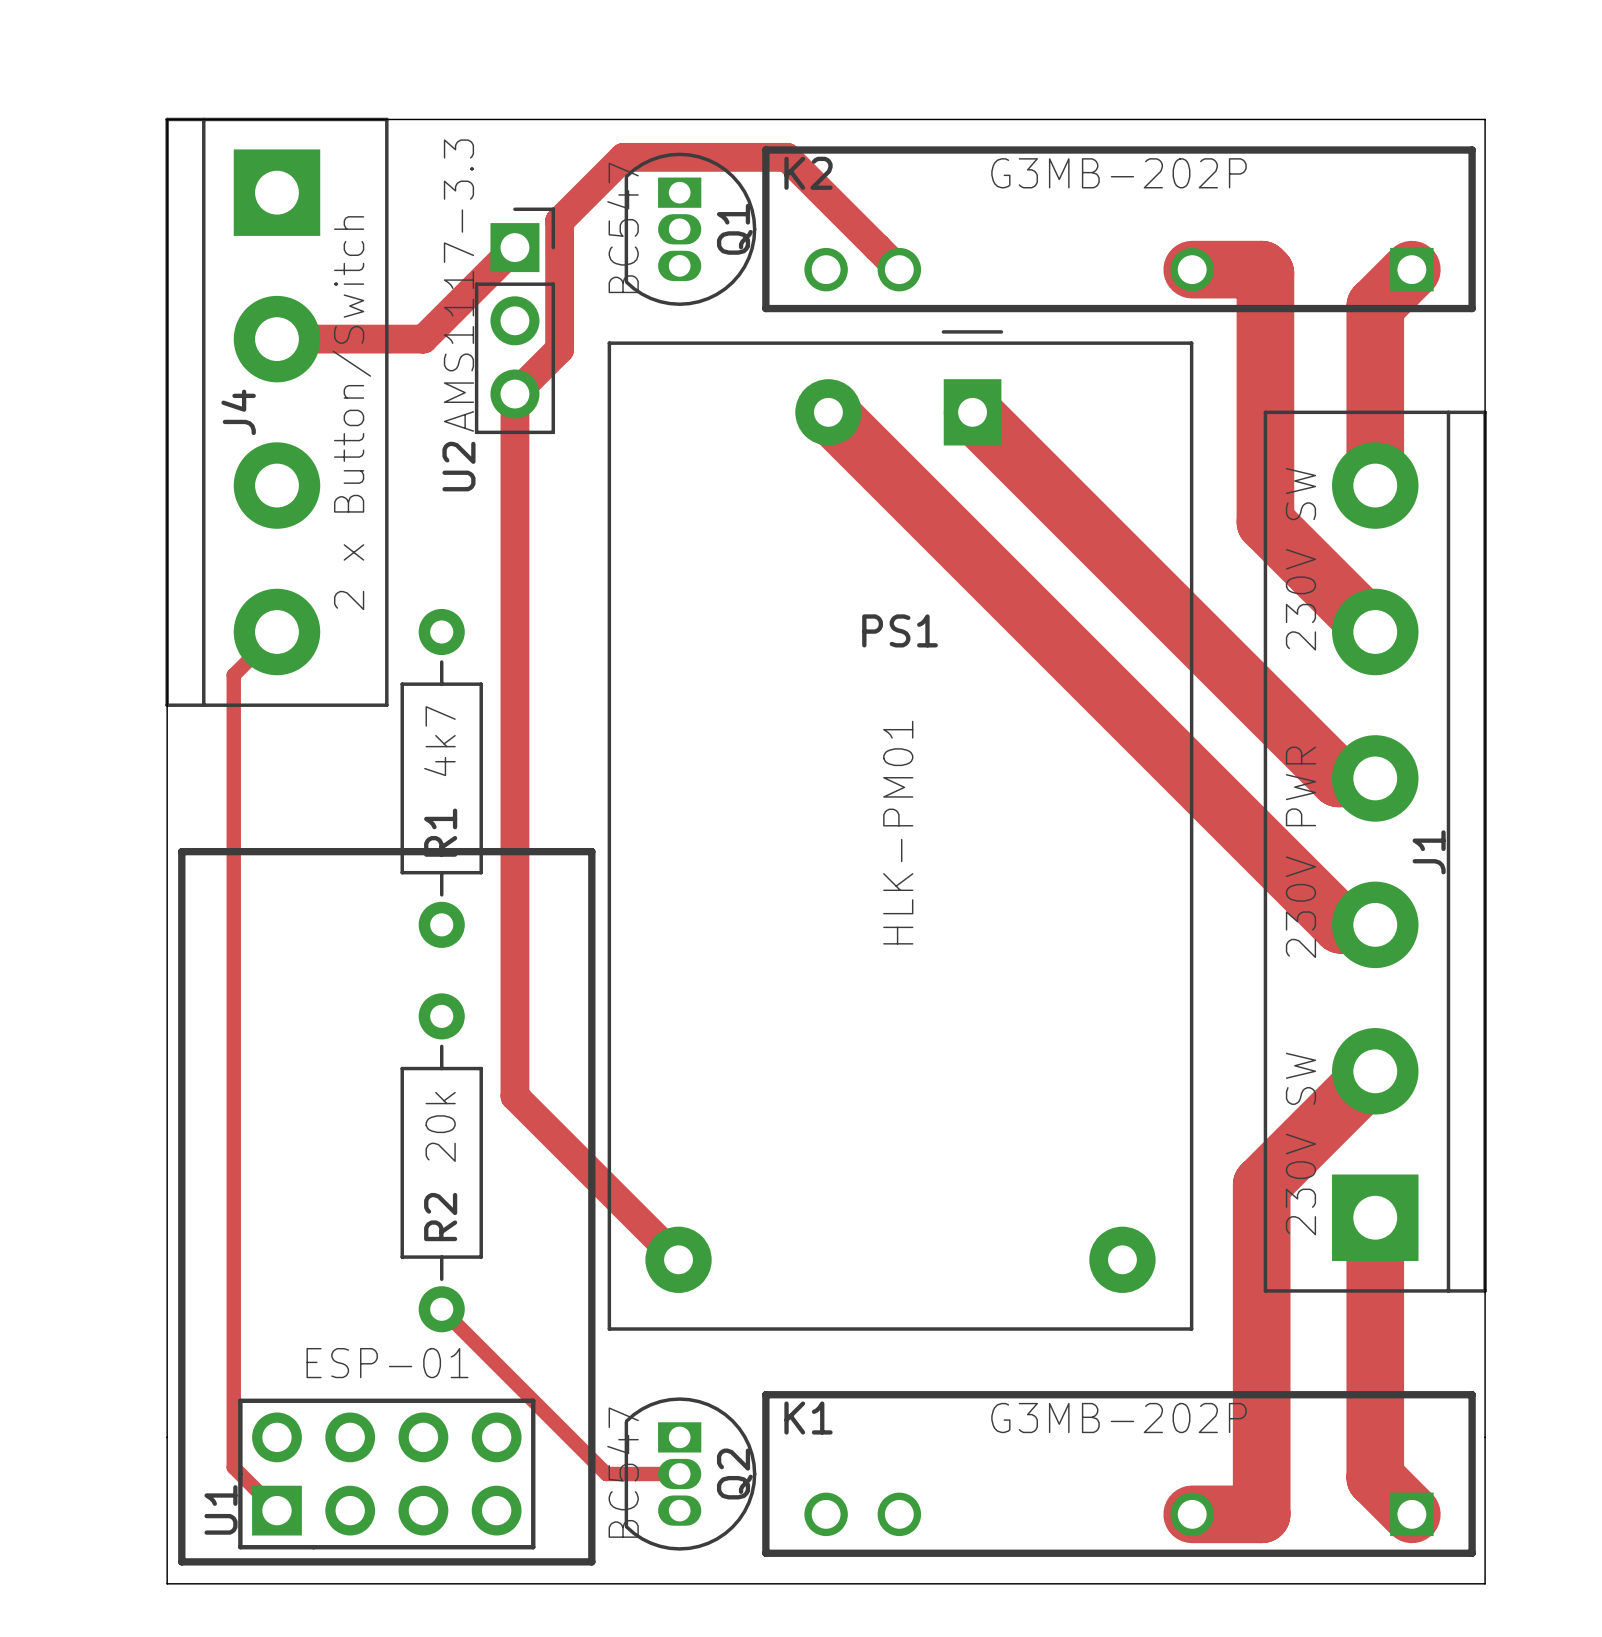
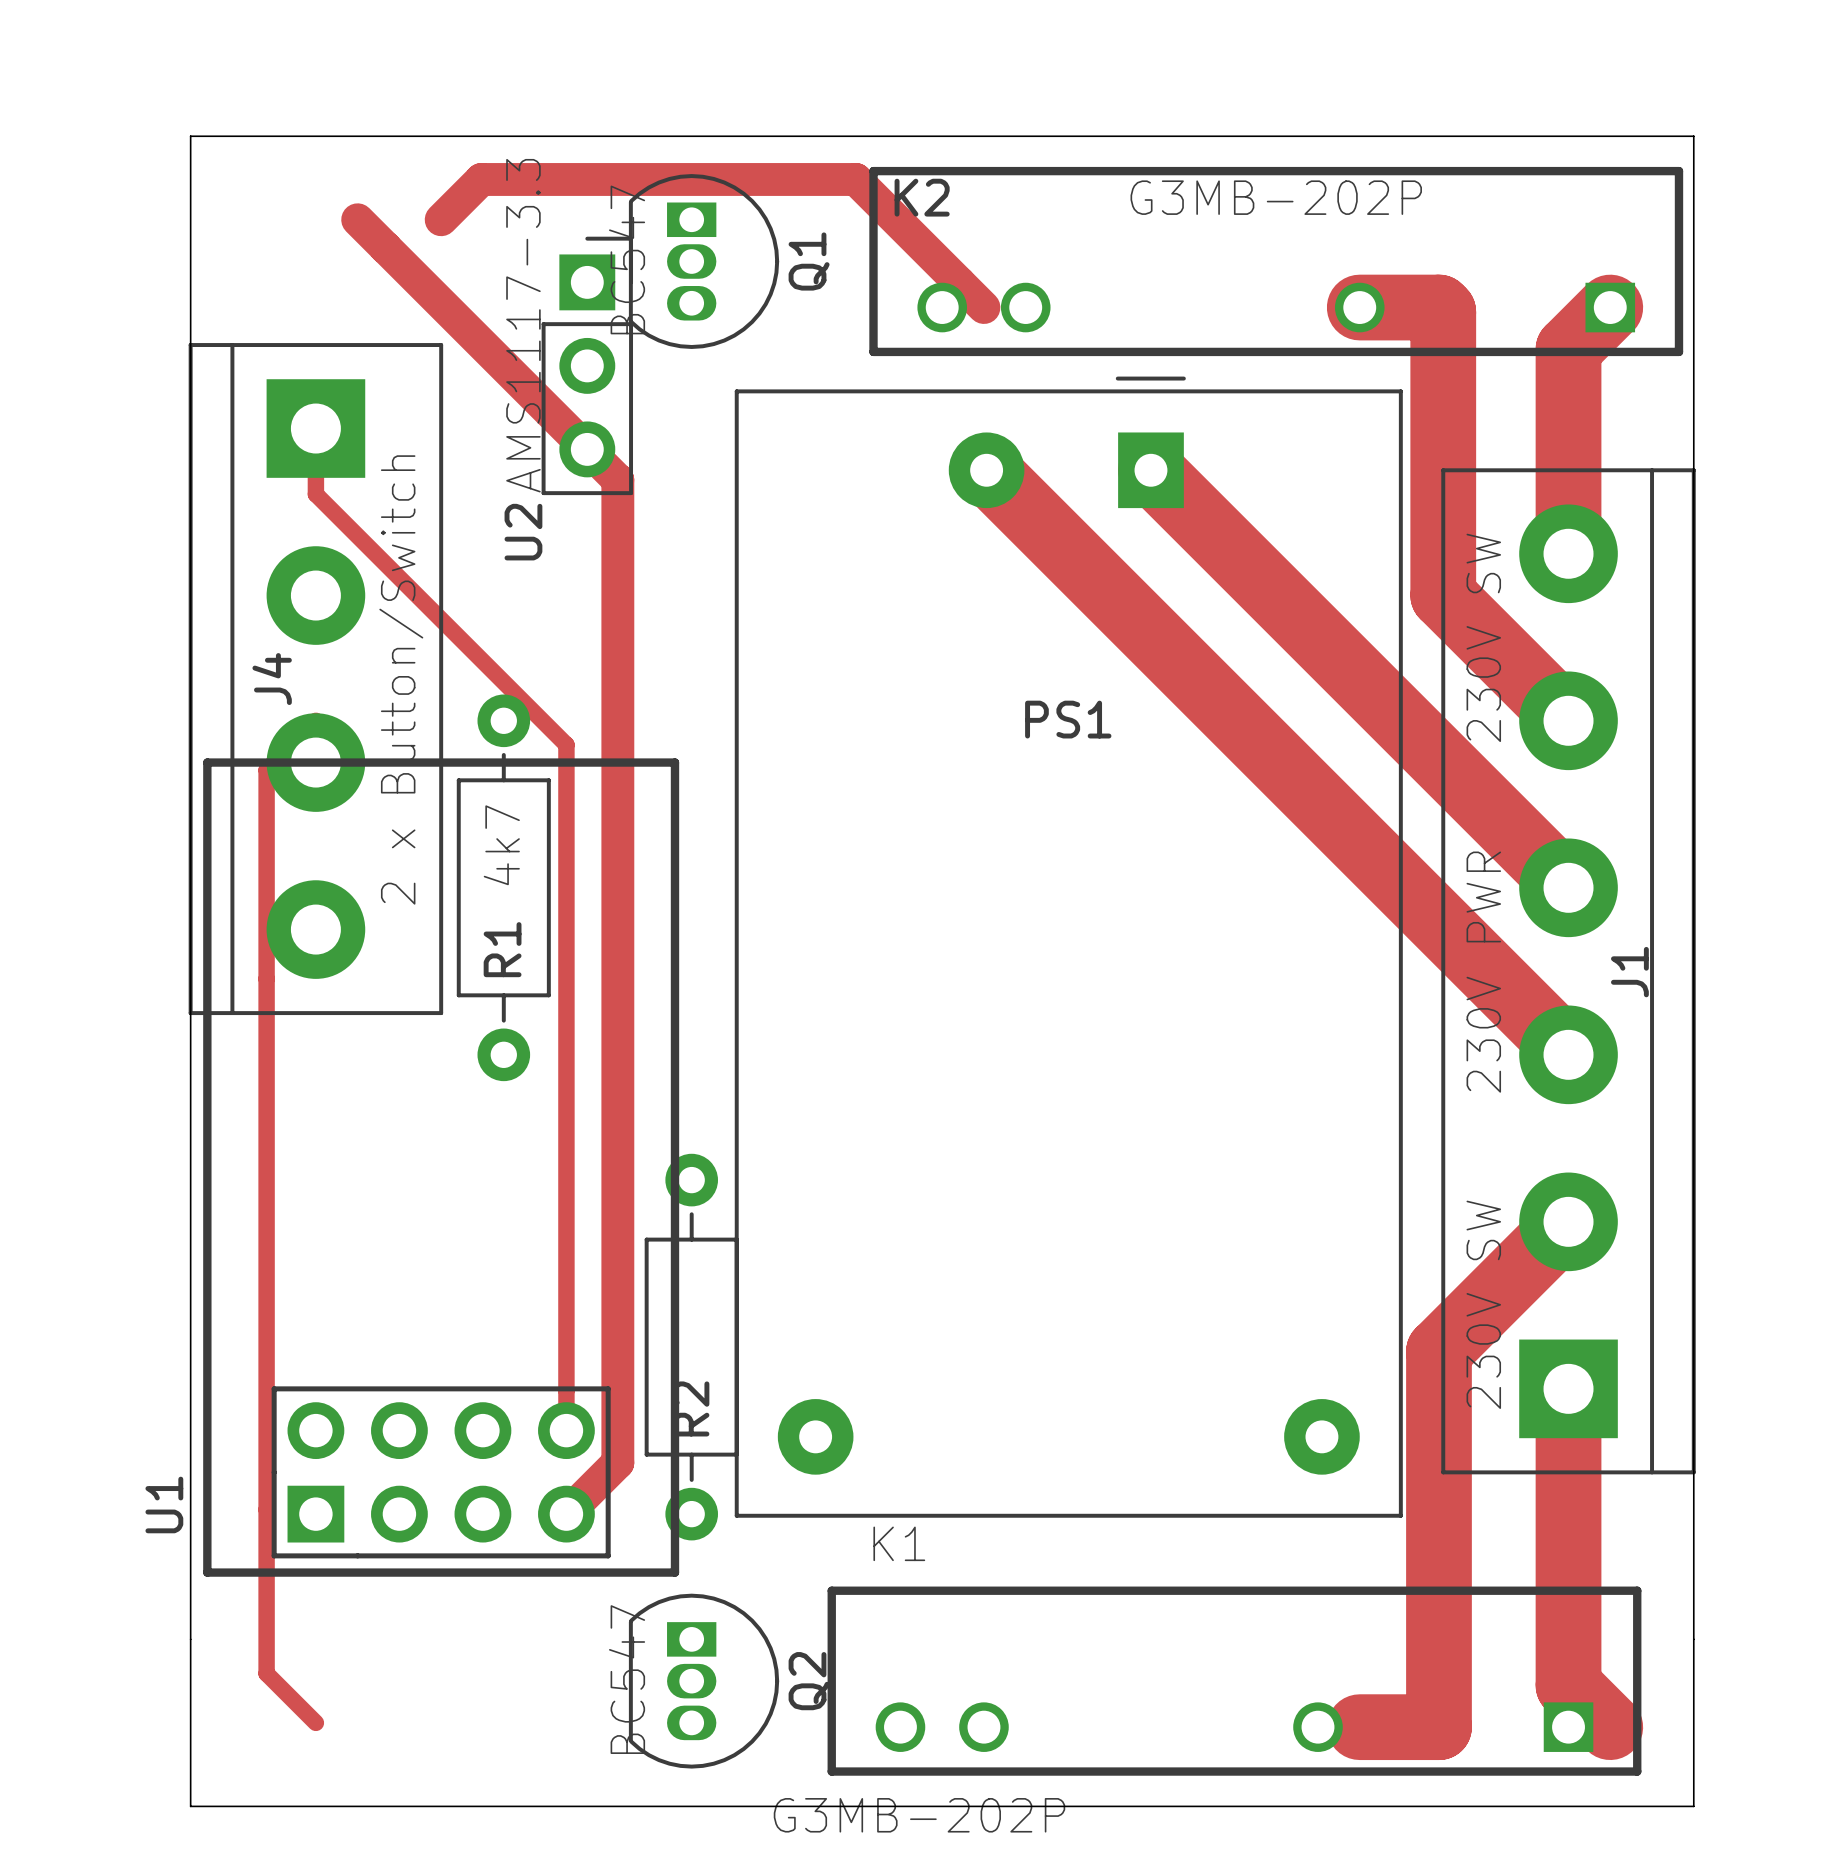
track: (623, 157) (559, 221) (559, 349) (514, 394) (514, 1096) (678, 1259) -> (711, 179) (481, 179) (441, 219)
track: (750, 157) (787, 157) (899, 269) -> (855, 179) (983, 307)
track: none -> (357, 219) (617, 479) (617, 1462) (566, 1514)
Q1 position: (690, 229) -> (704, 261)
Q1 name position: Q1 (734, 229) -> Q1 (809, 261)
track: (514, 247) (423, 339) (276, 339) -> none
track: none -> (315, 428) (315, 494) (566, 744) (566, 1430)
J4 position: (276, 412) -> (315, 679)
track: (828, 412) (1340, 924) (1375, 924) -> none
track: none -> (986, 470) (1568, 1052)
track: (972, 412) (1338, 778) (1375, 778) -> (1150, 470) (1568, 887)
PS1 position: (900, 830) -> (1068, 947)
PS1 value: HLK-PM01 (898, 832) -> none
R2 value: 20k (440, 1126) -> none
R2 position: (441, 1162) -> (691, 1347)
U1 position: (386, 1206) -> (441, 1167)
track: (441, 1309) (606, 1474) (679, 1474) -> none
U1 value: ESP-01 (387, 1363) -> none
K1 name position: K1 (808, 1418) -> K1 (899, 1543)
K1 value position: G3MB-202P (1119, 1418) -> G3MB-202P (919, 1815)
Q2 position: (690, 1474) -> (704, 1681)
Q2 name position: Q2 (734, 1474) -> Q2 (809, 1681)
K1 position: (1119, 1474) -> (1234, 1681)
U1 name position: U1 (220, 1509) -> U1 (164, 1504)

